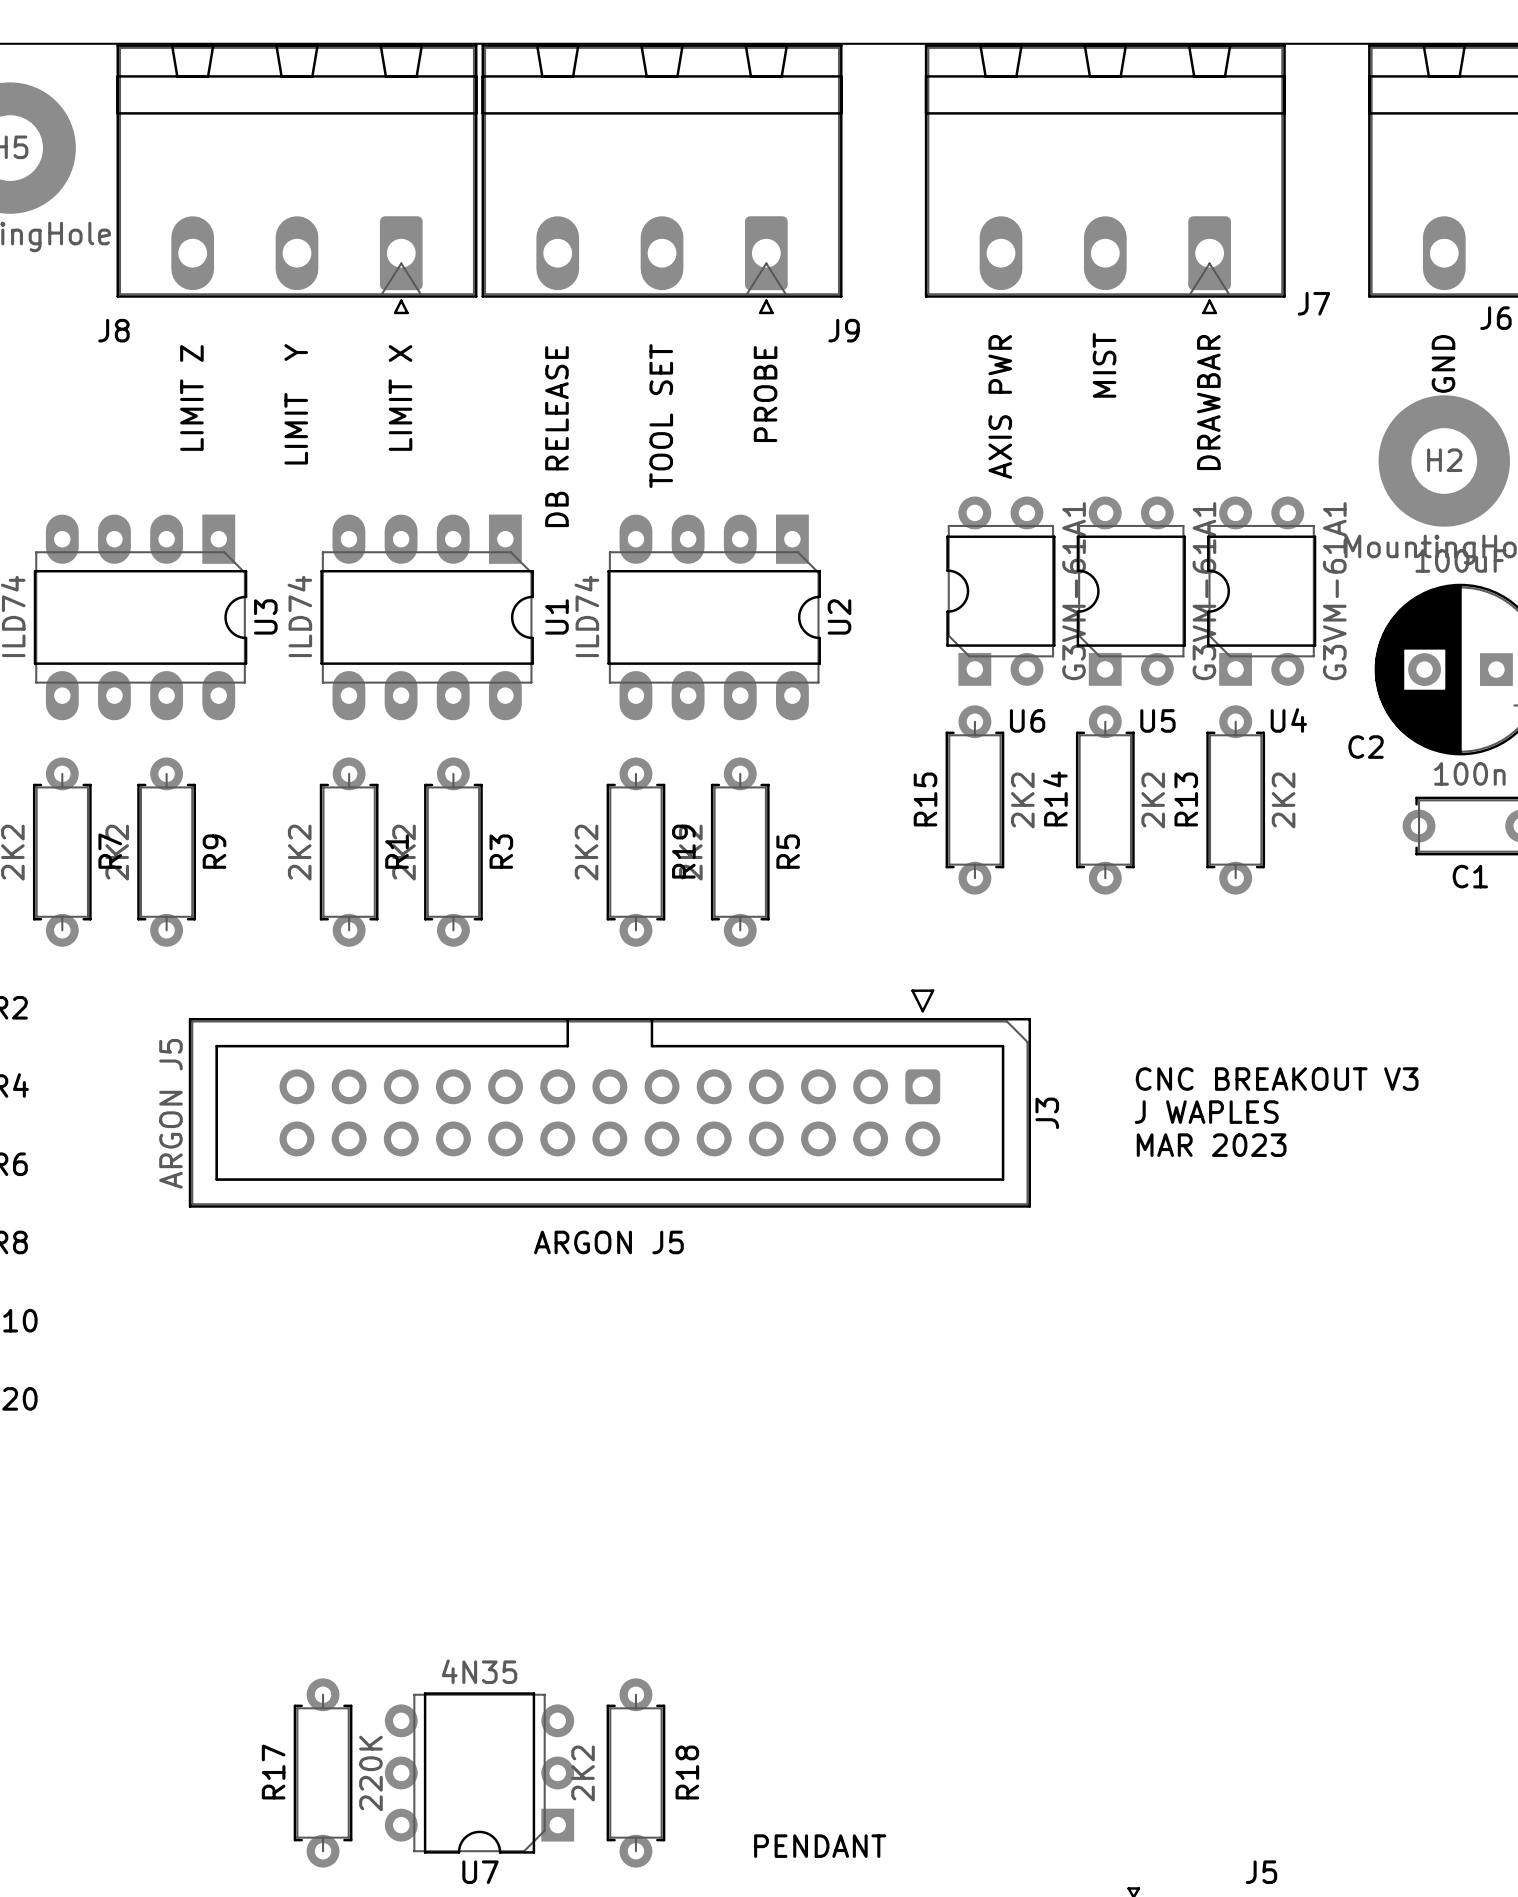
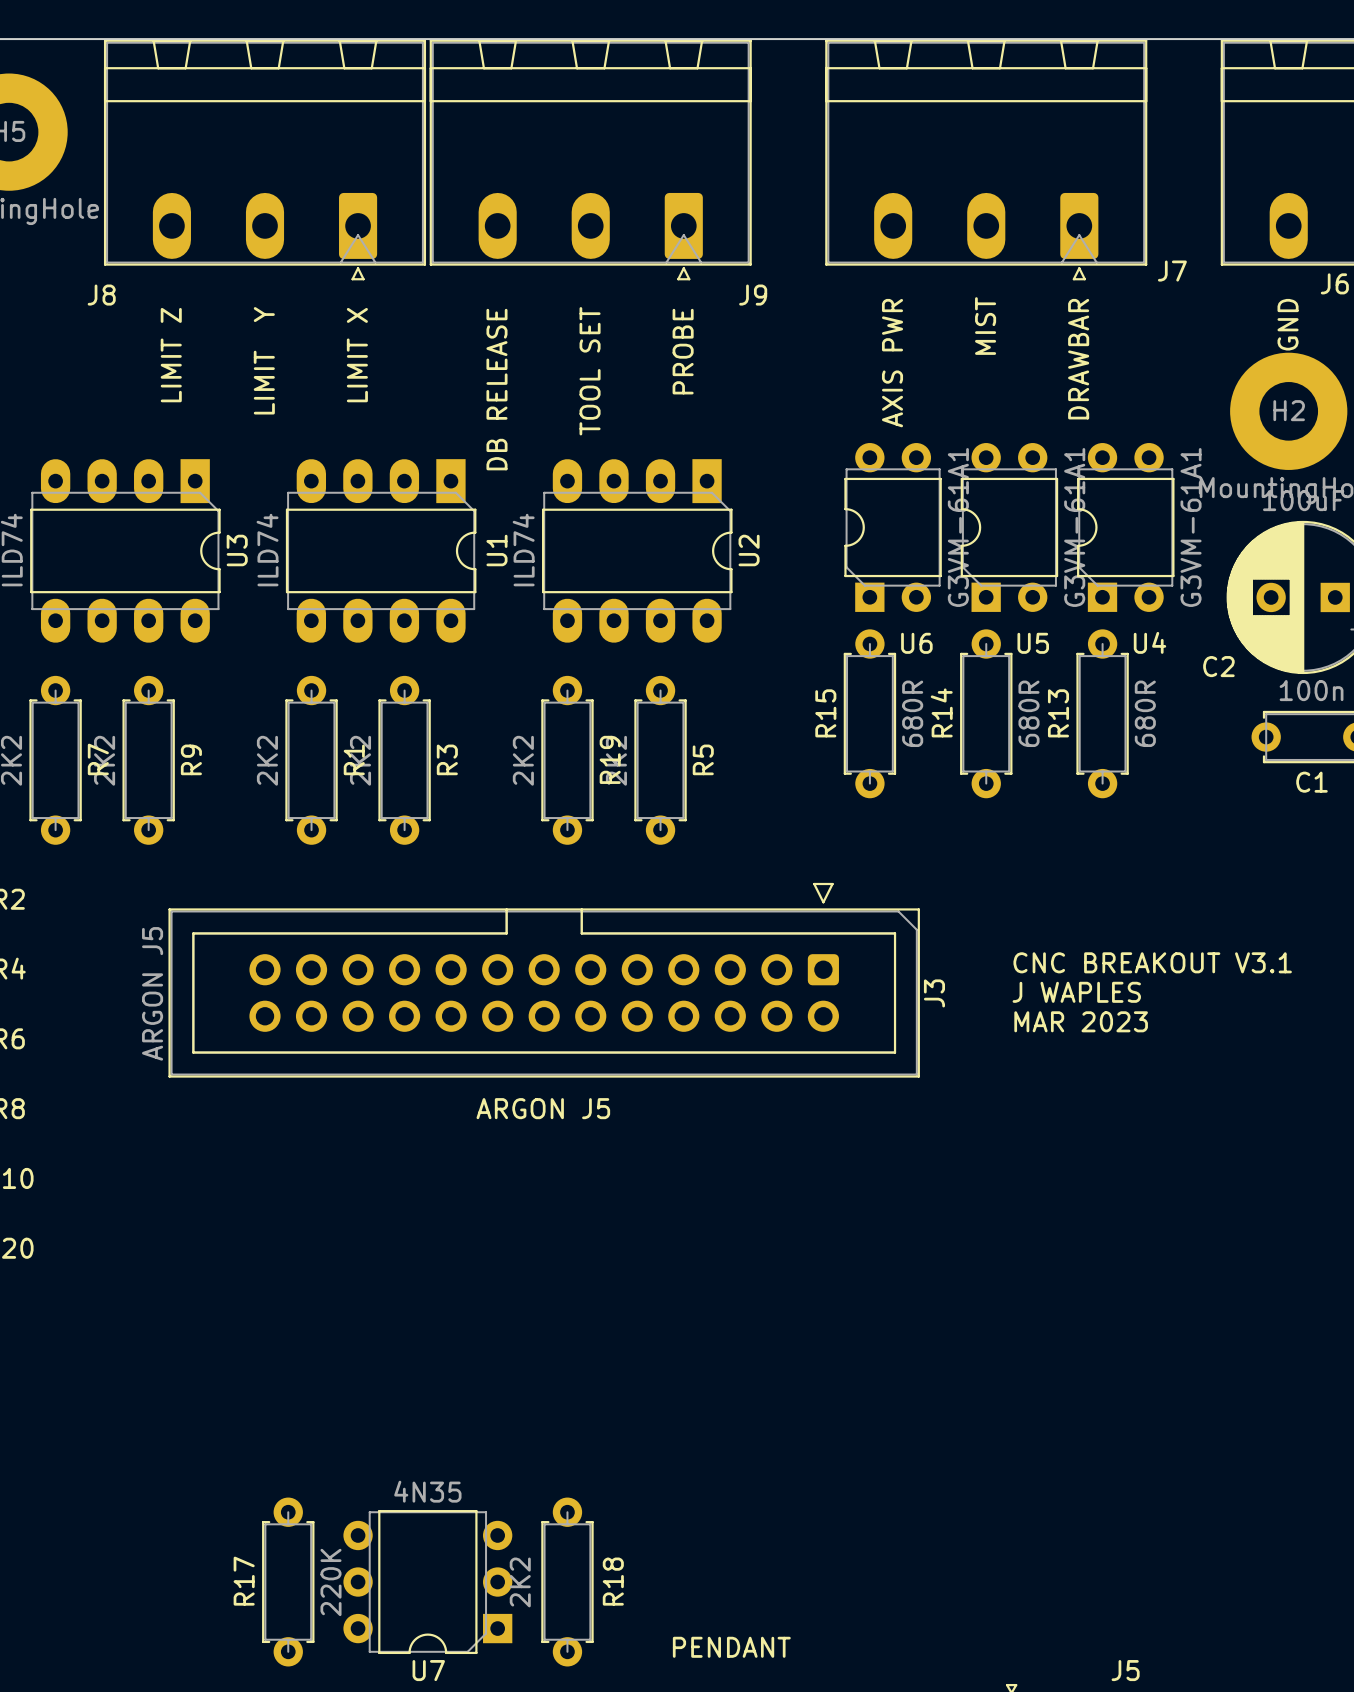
R15 value: 2K2 (1022, 800) -> 680R (912, 713)
R14 value: 2K2 (1153, 800) -> 680R (1028, 713)
R13 value: 2K2 (1283, 800) -> 680R (1145, 713)
text: CNC BREAKOUT V3 (1277, 1079) -> CNC BREAKOUT V3.1 (1152, 962)

